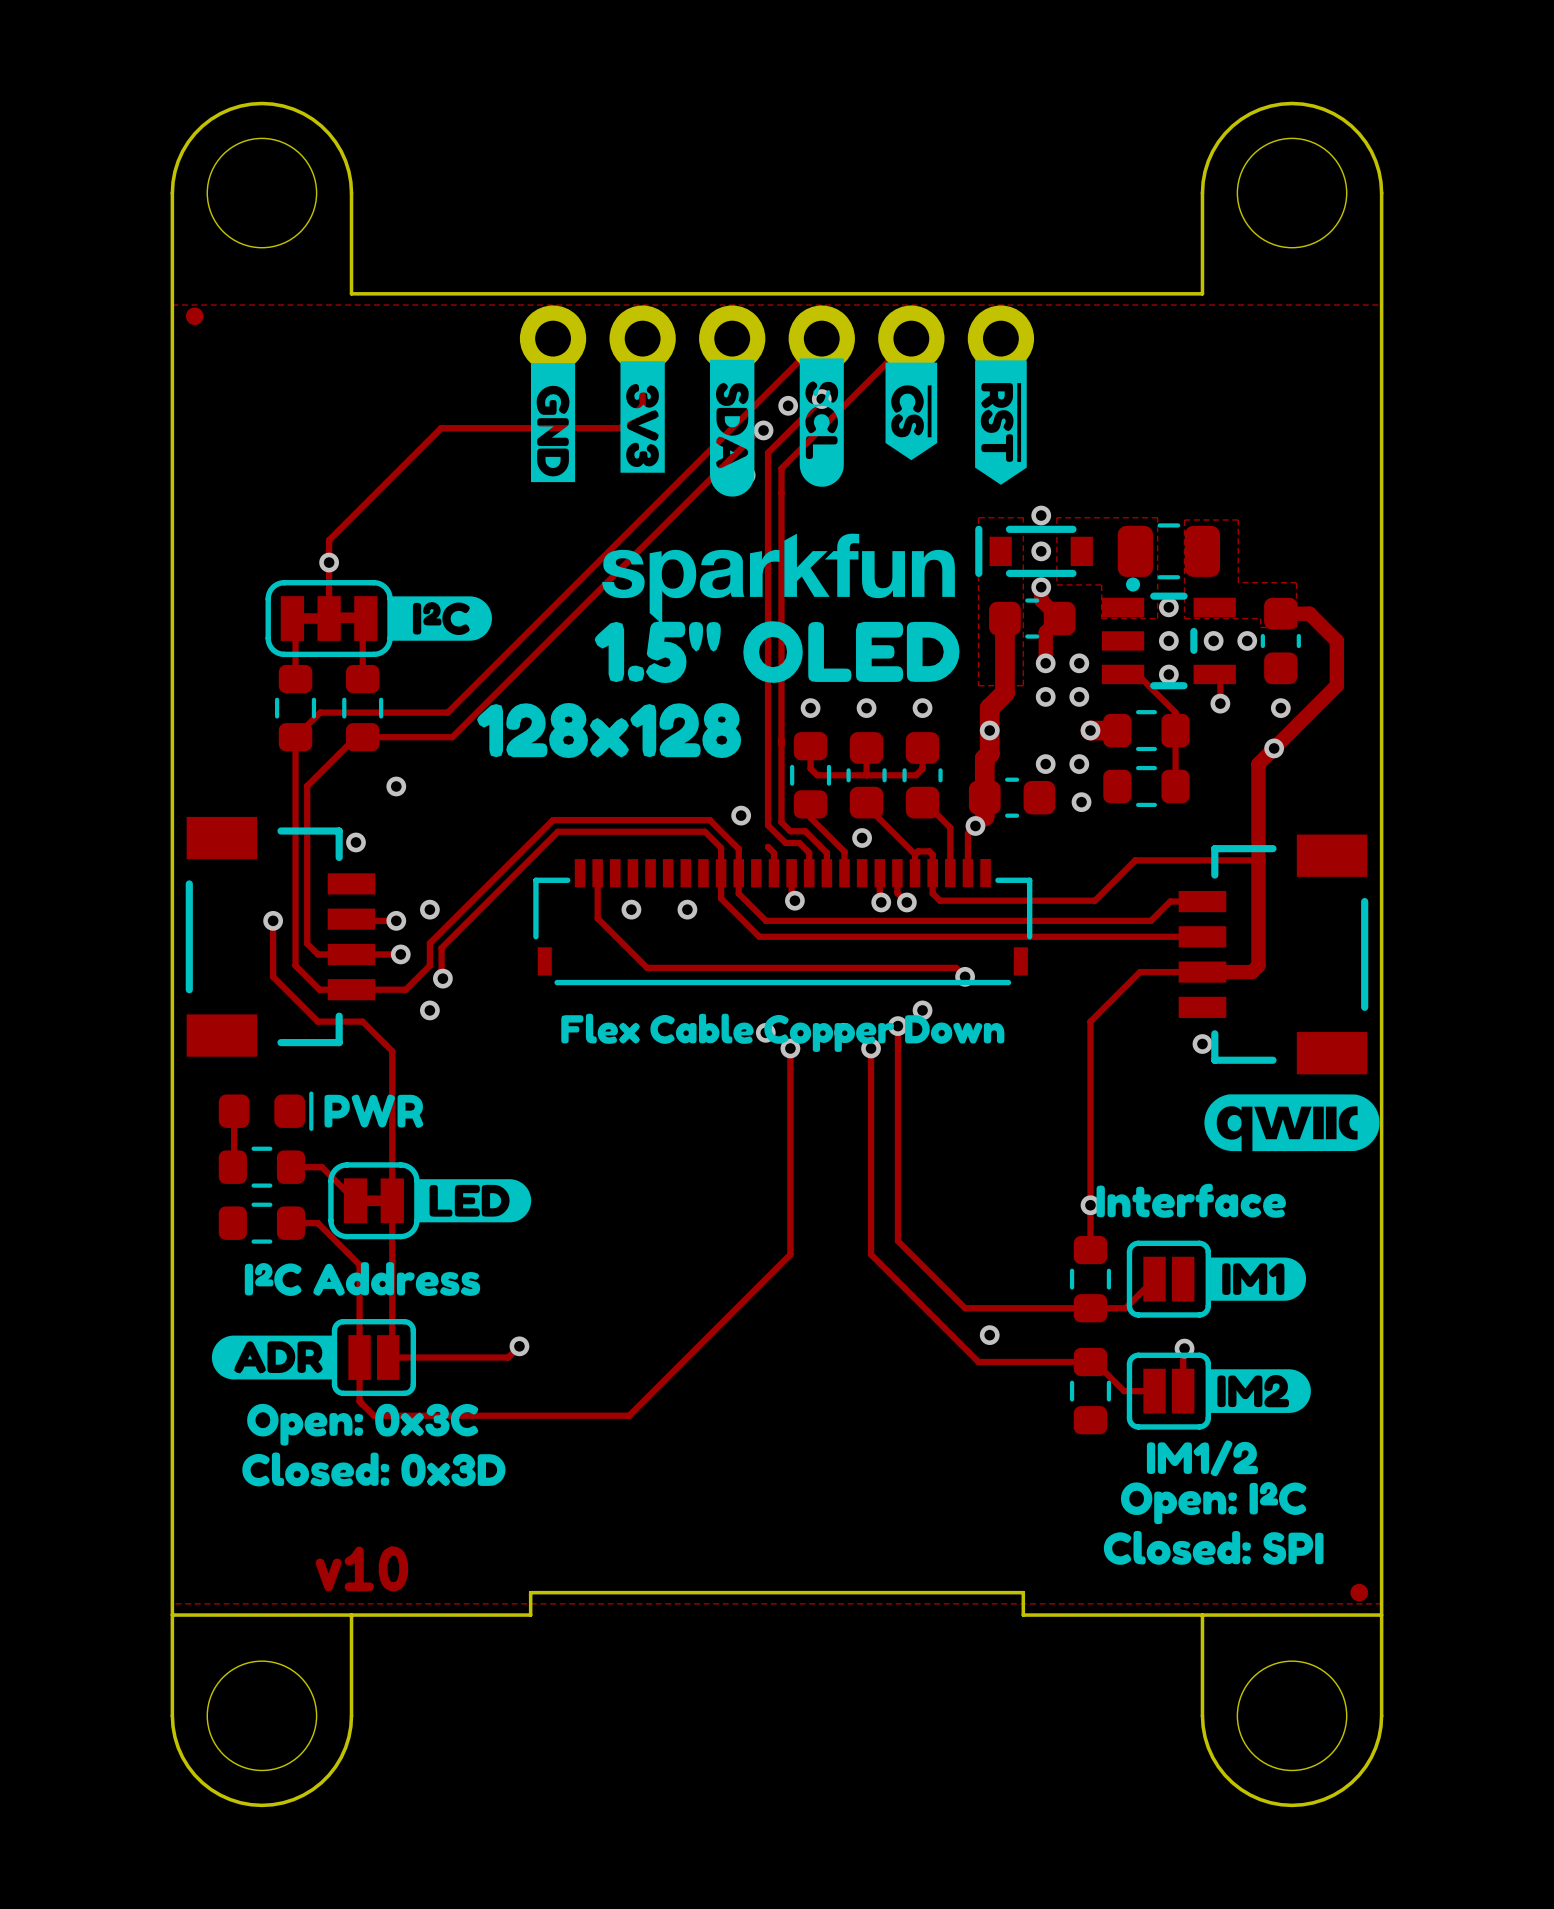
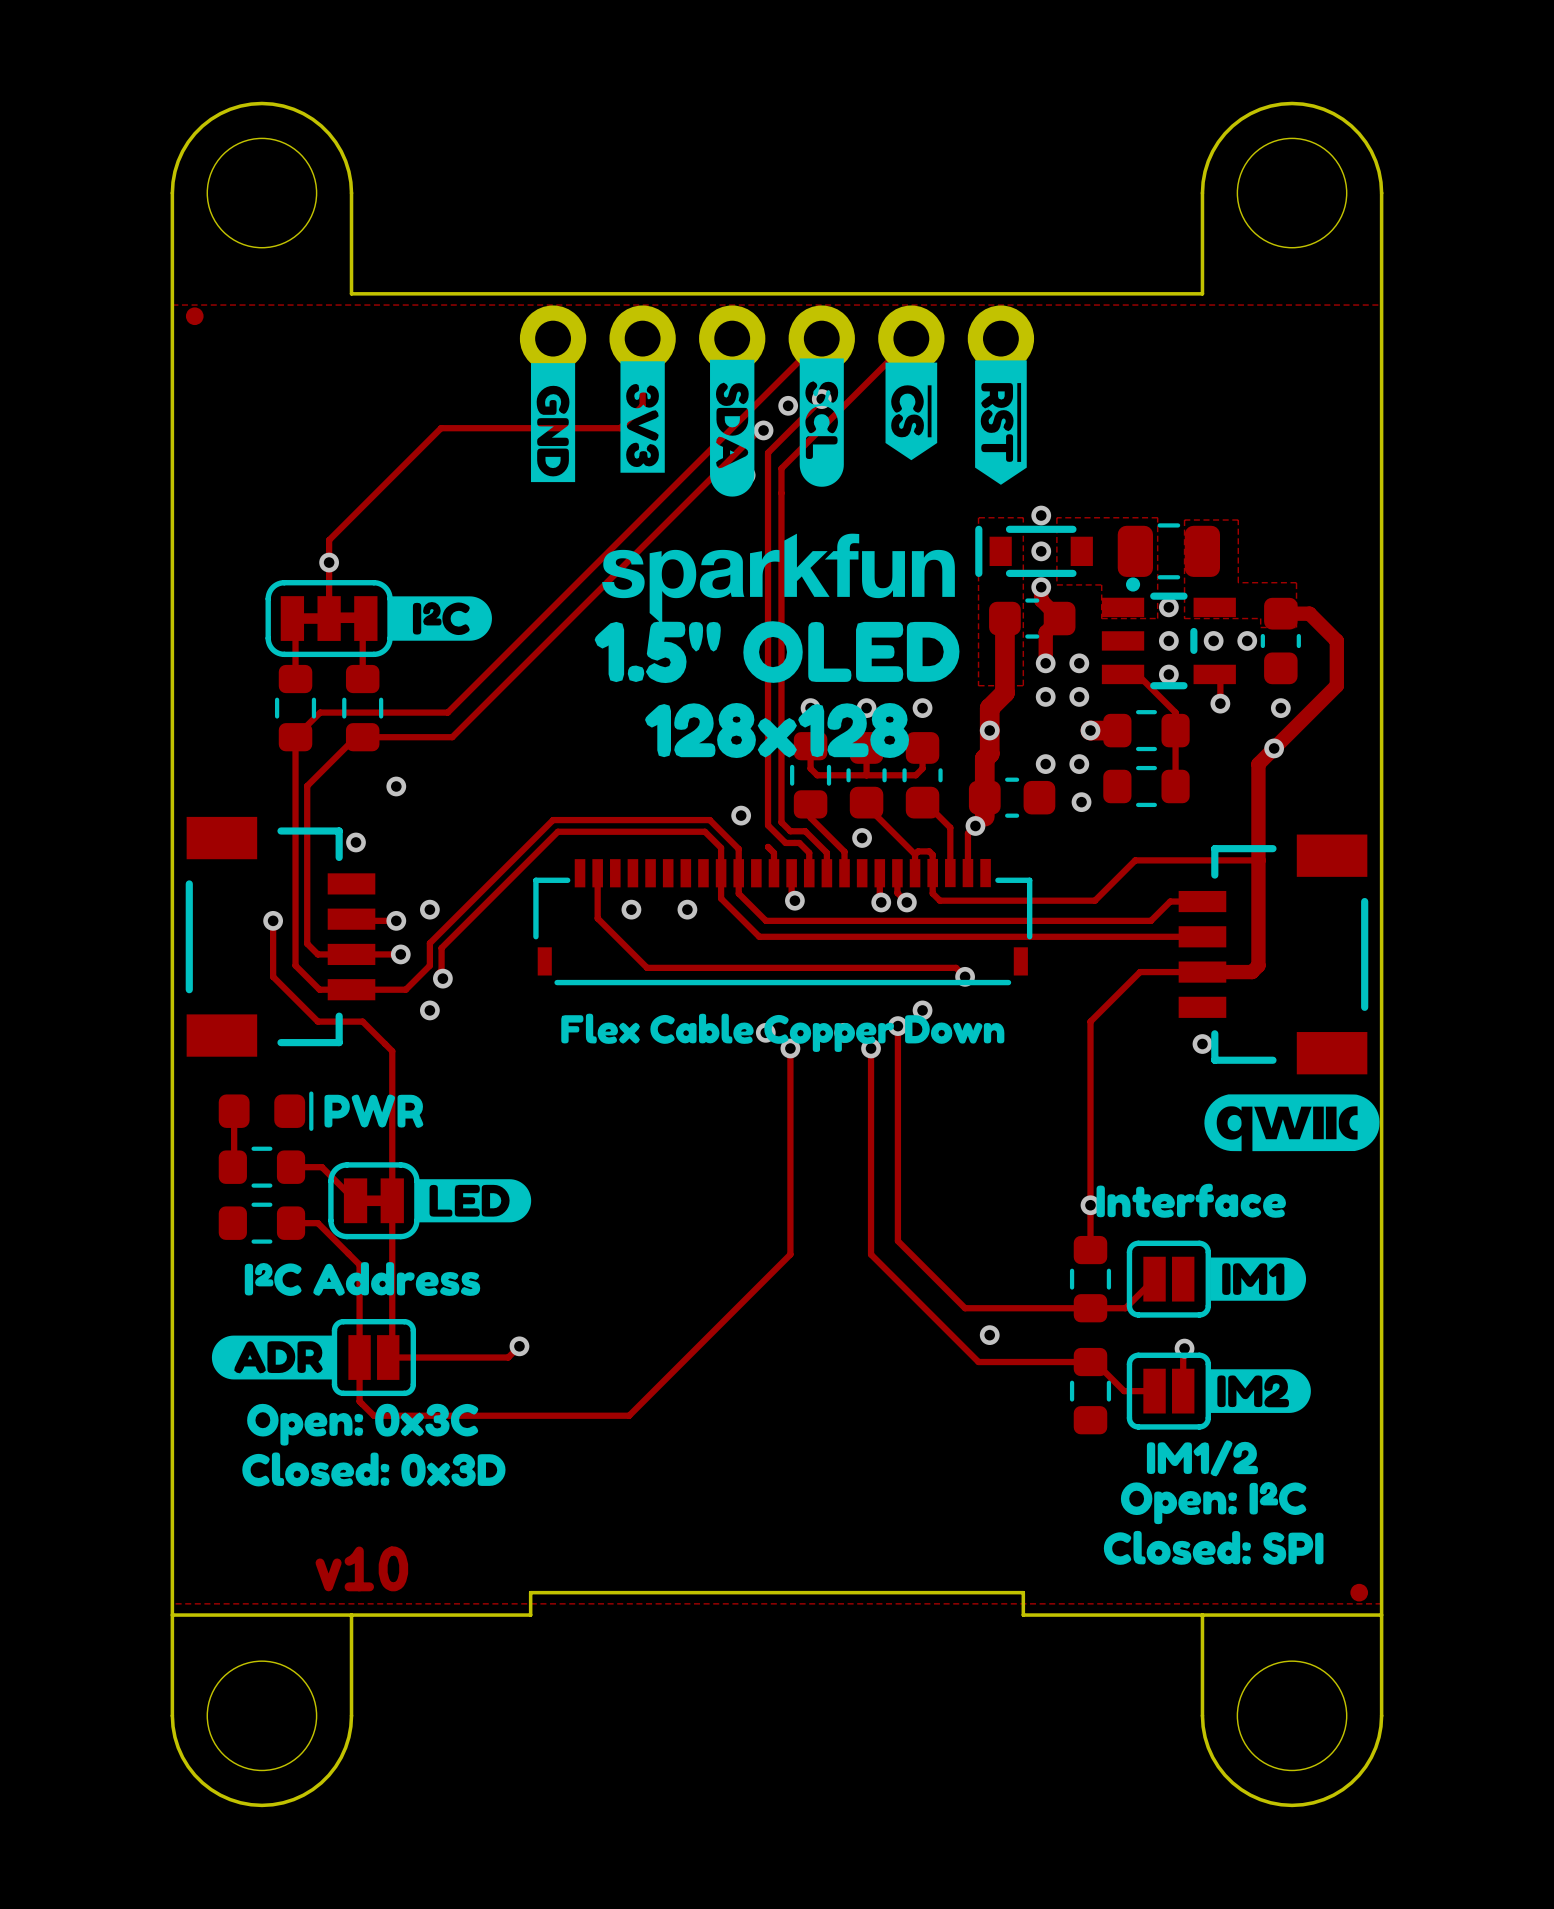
drawing position: (609, 730) -> (777, 730)

